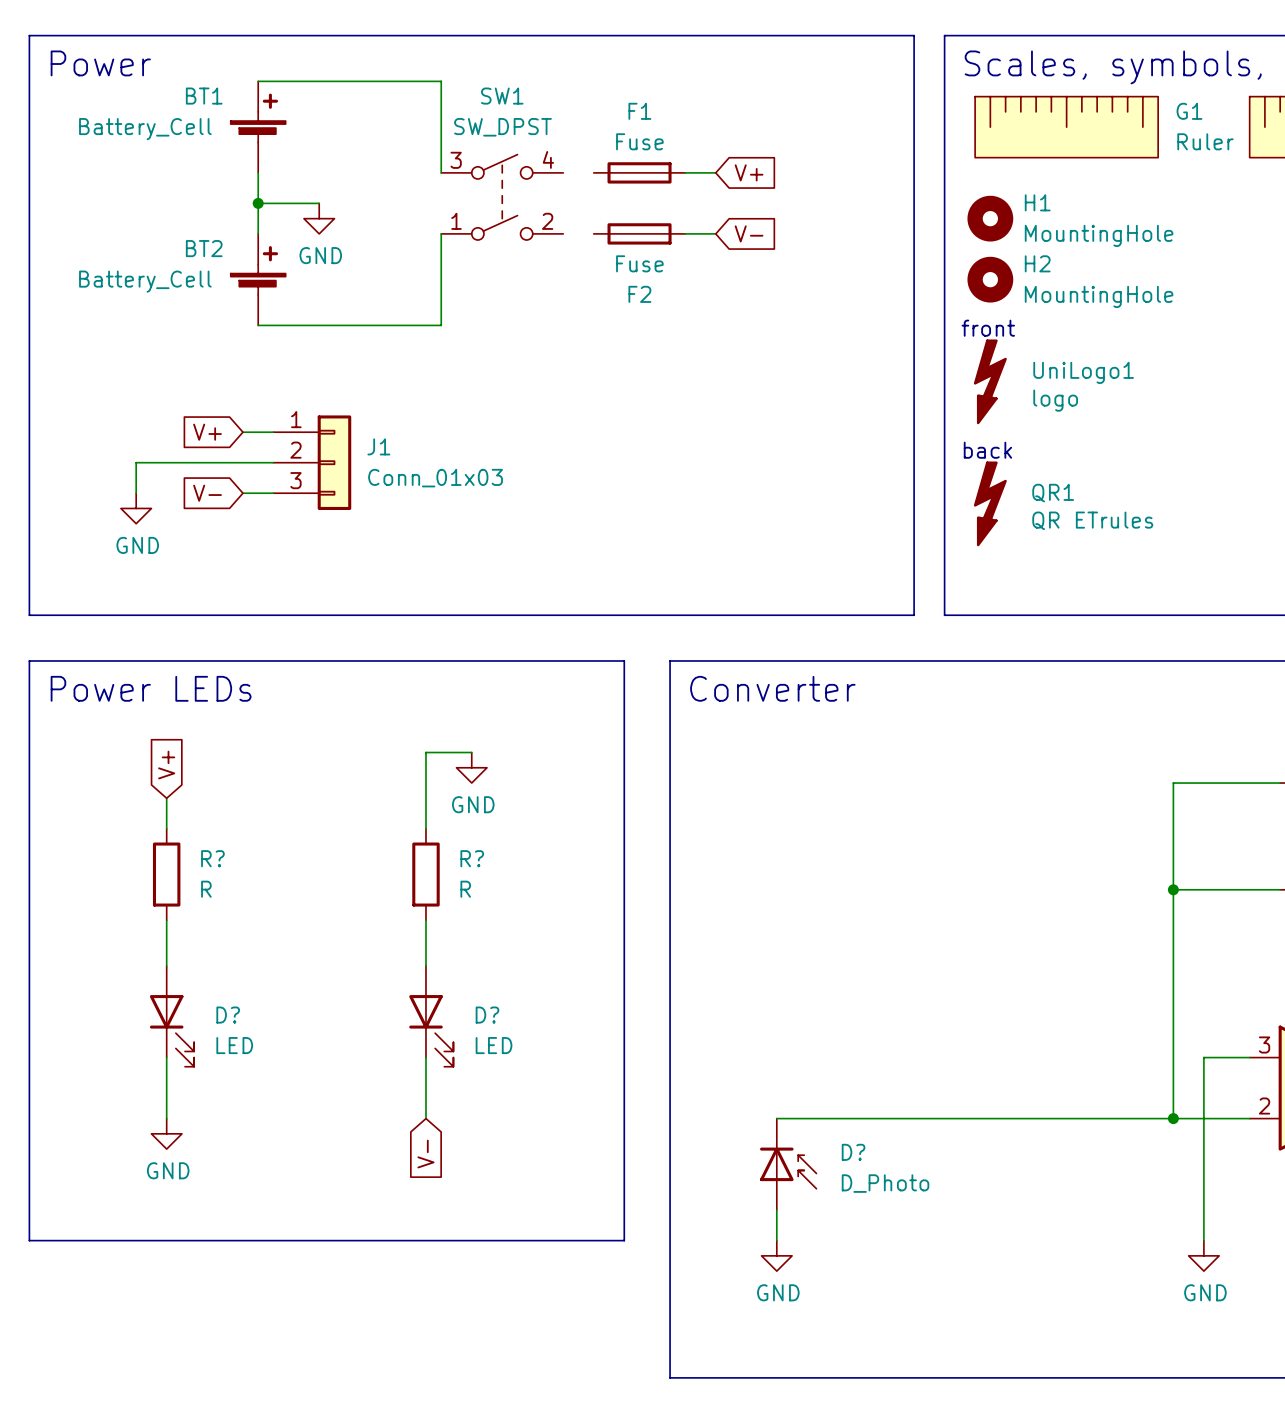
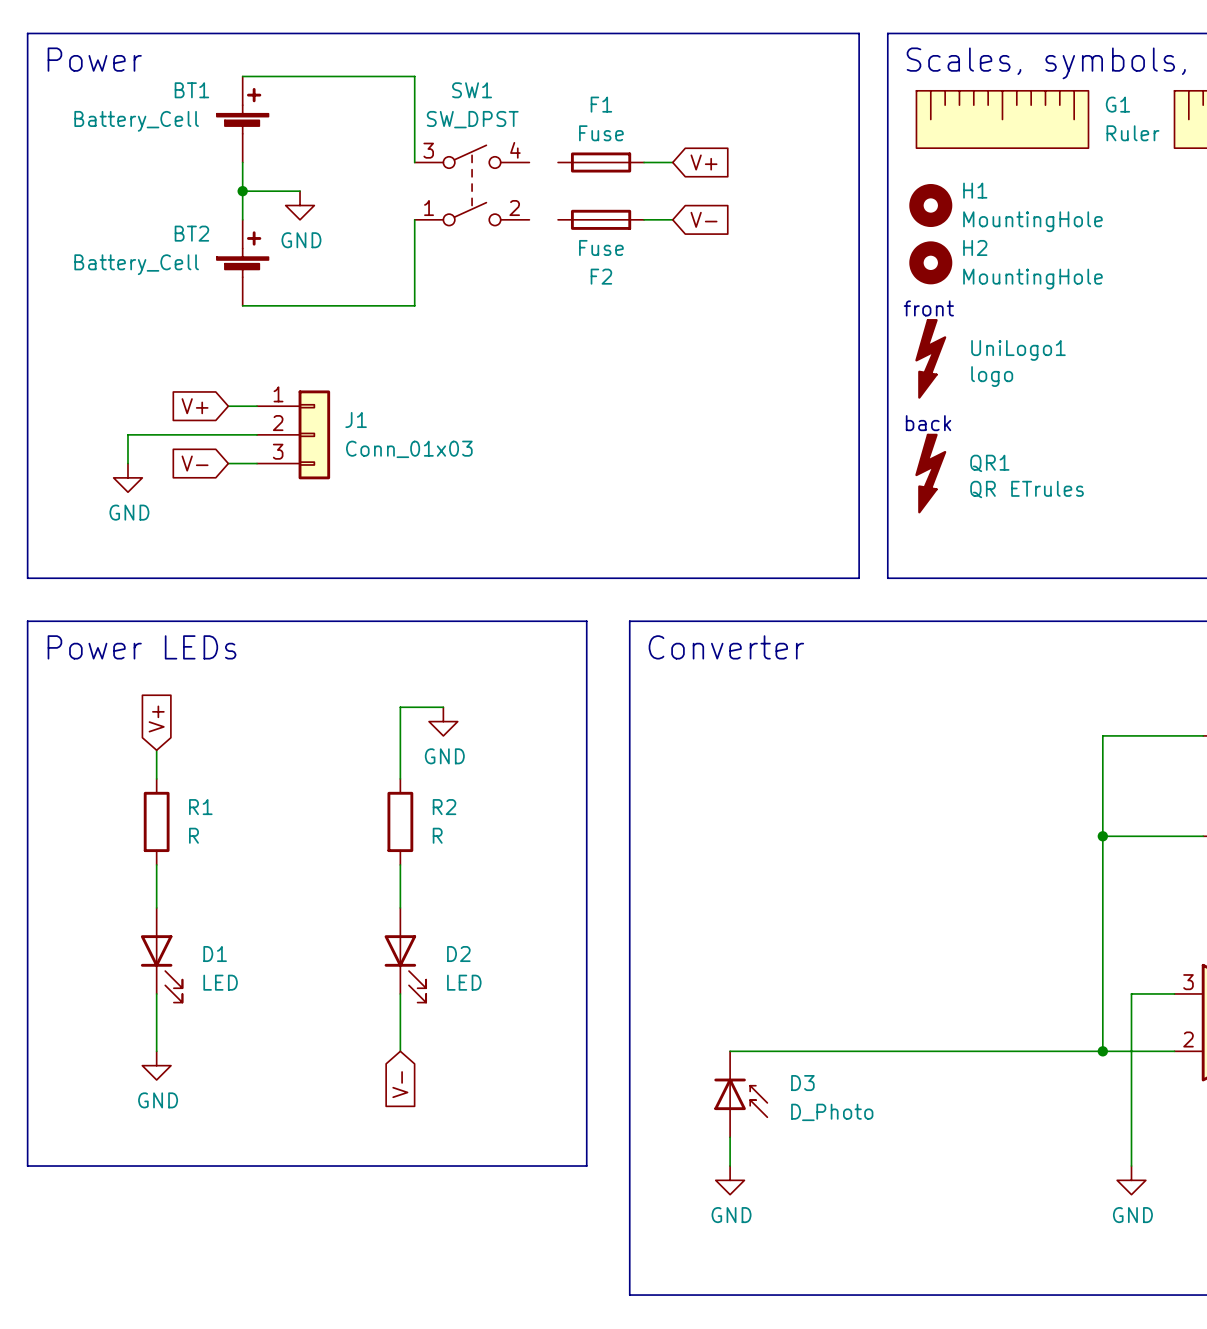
R? name: R? (212, 858) -> R1 (200, 807)
R? name: R? (472, 858) -> R2 (444, 807)
D? name: D? (228, 1015) -> D1 (215, 954)
D? name: D? (487, 1015) -> D2 (458, 954)
D? name: D? (853, 1152) -> D3 (802, 1083)

